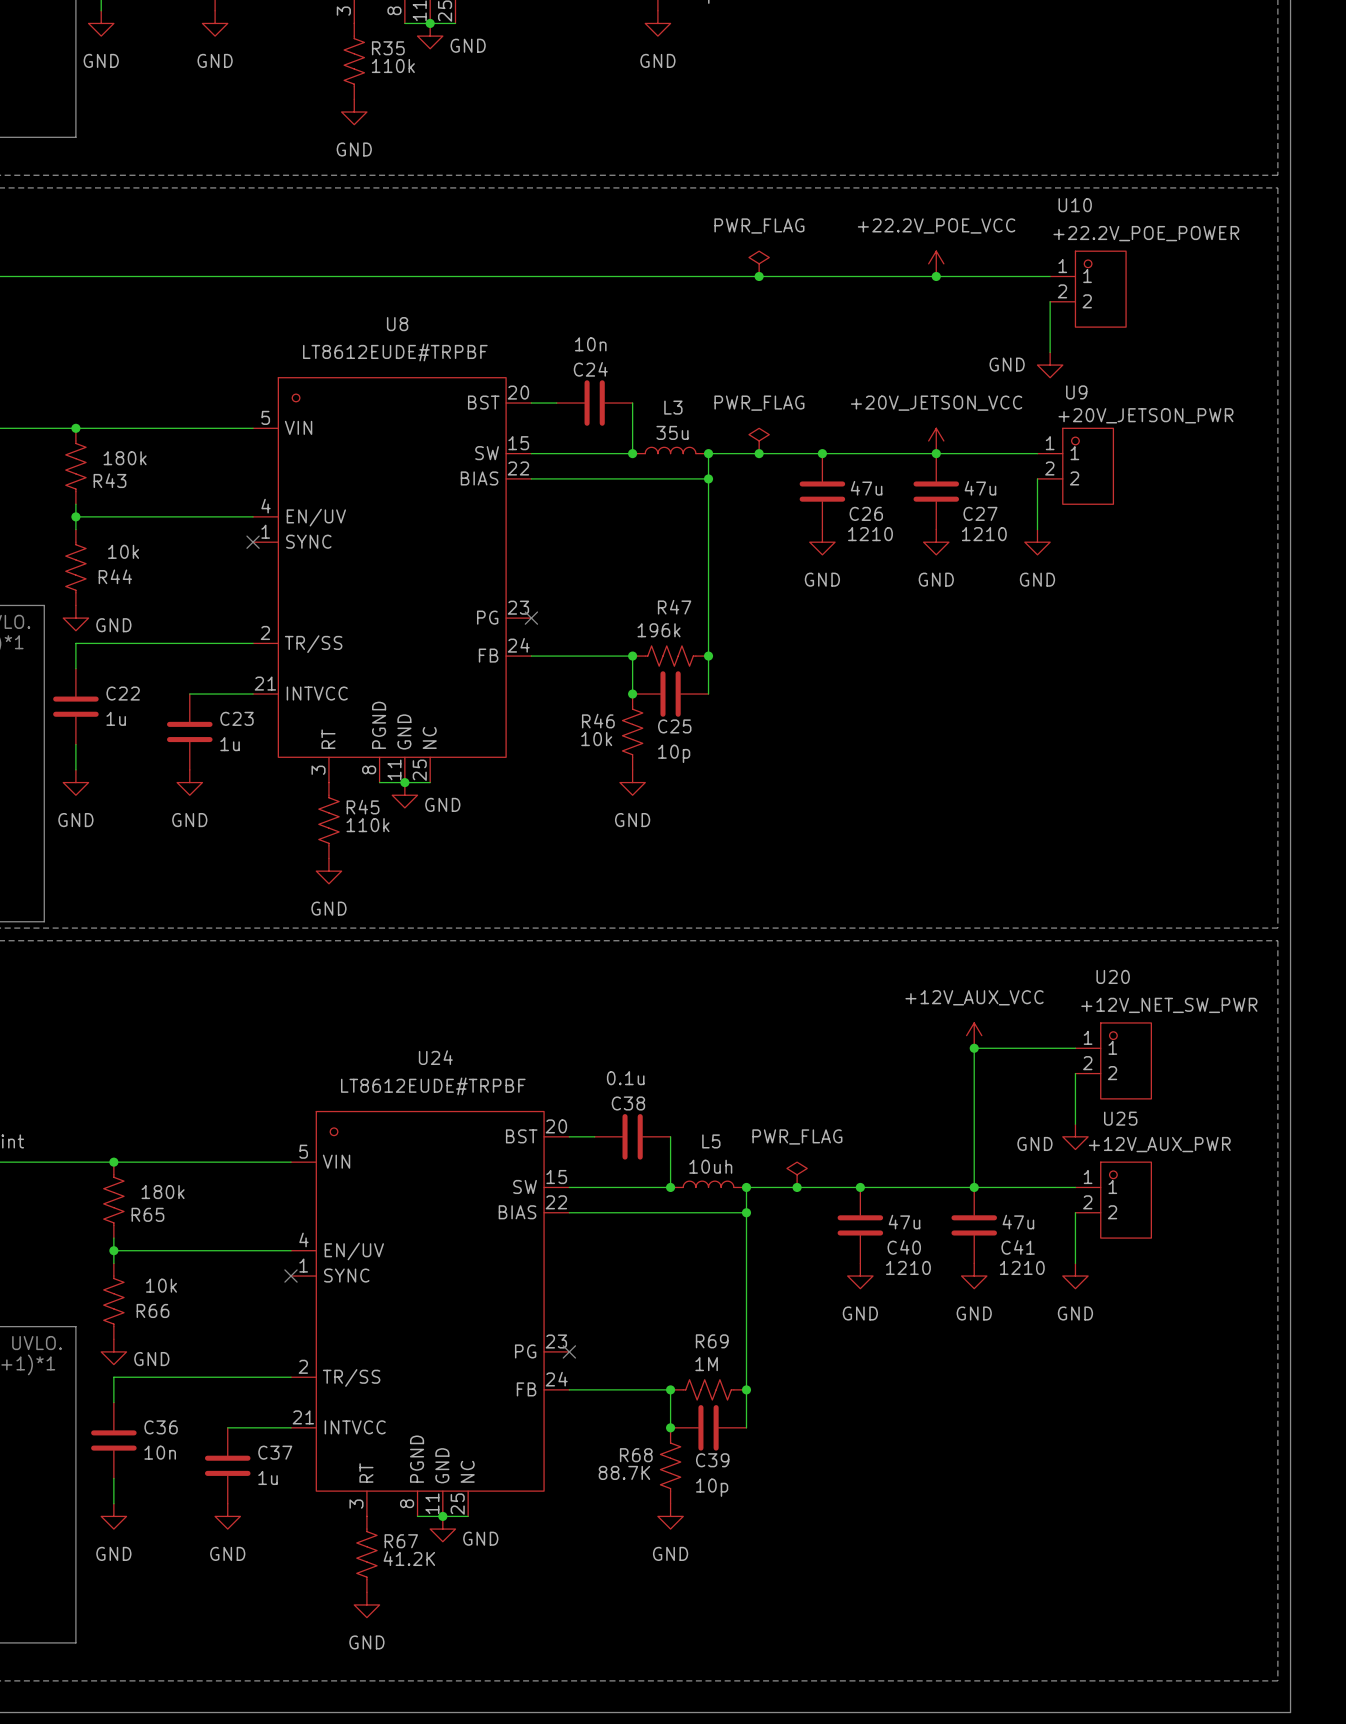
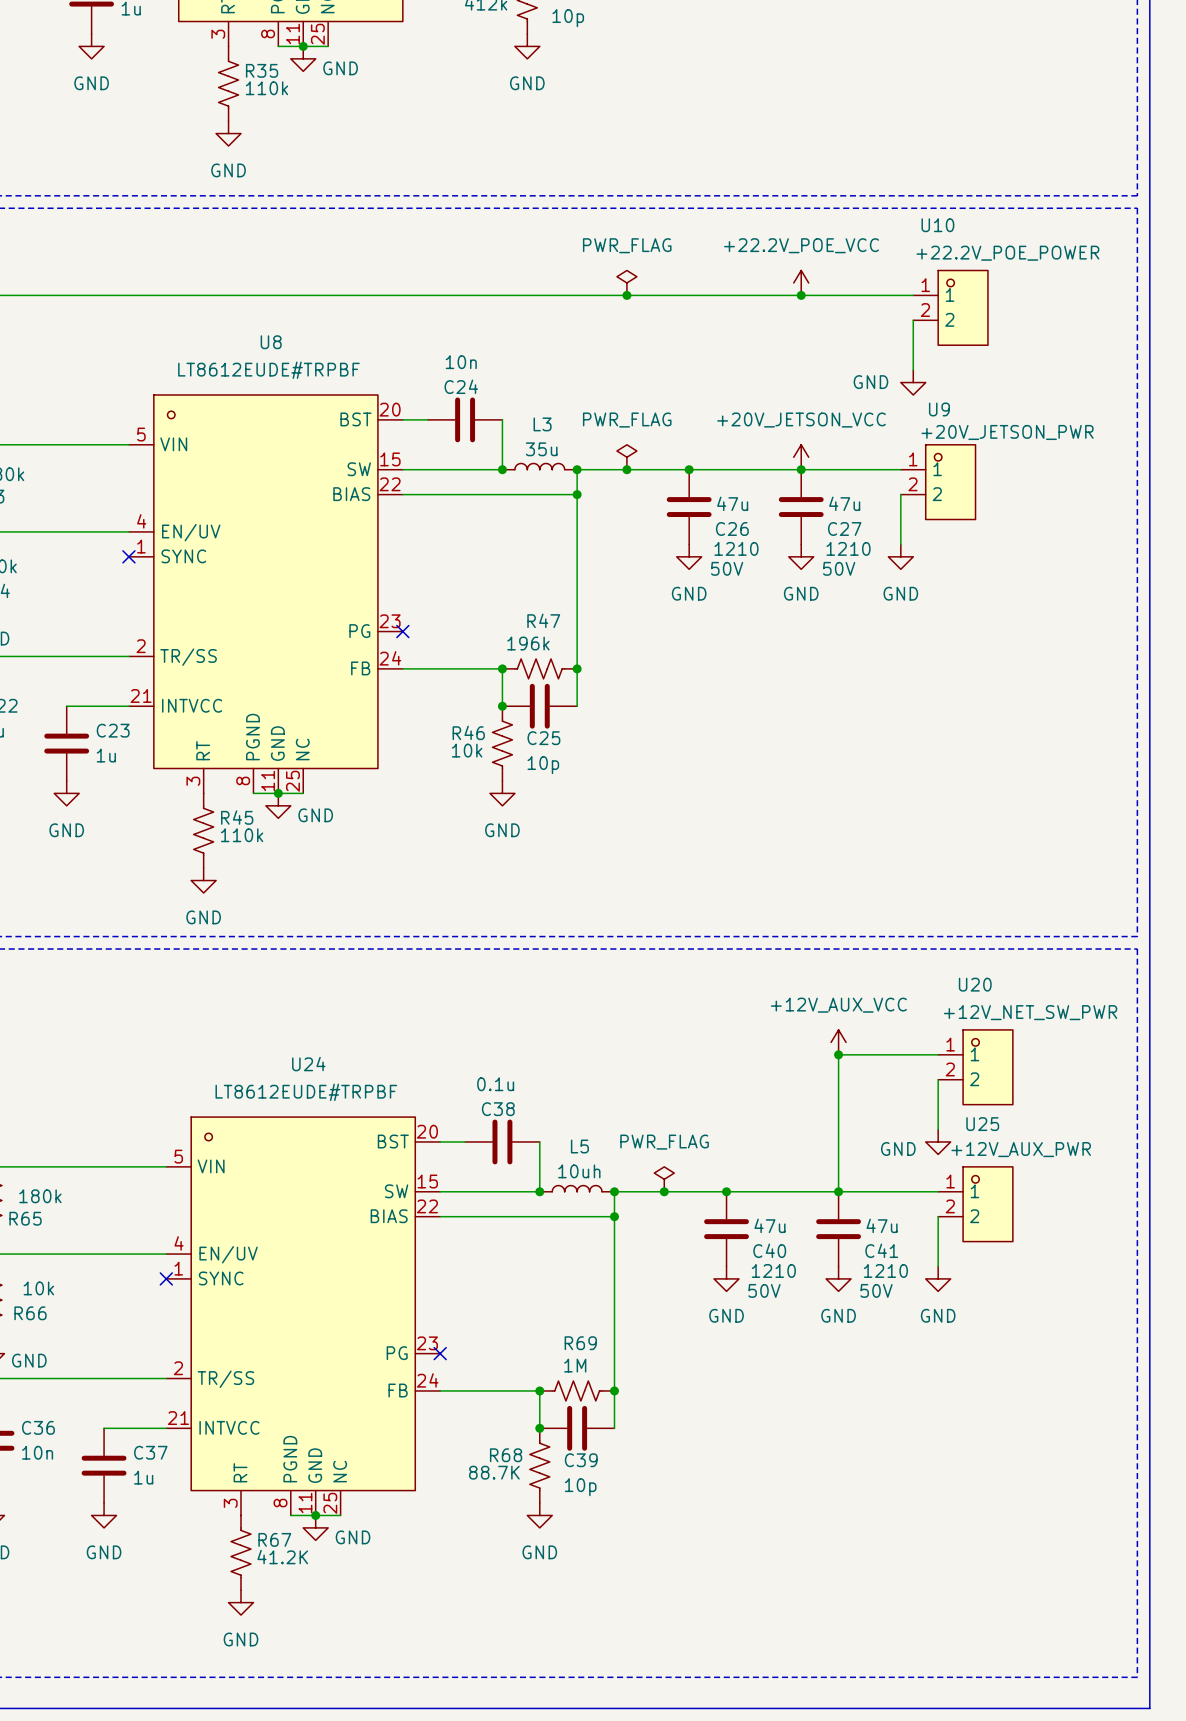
C26 text: none -> 50V (727, 568)
C27 text: none -> 50V (839, 568)
C40 text: none -> 50V (764, 1290)
C41 text: none -> 50V (876, 1290)

